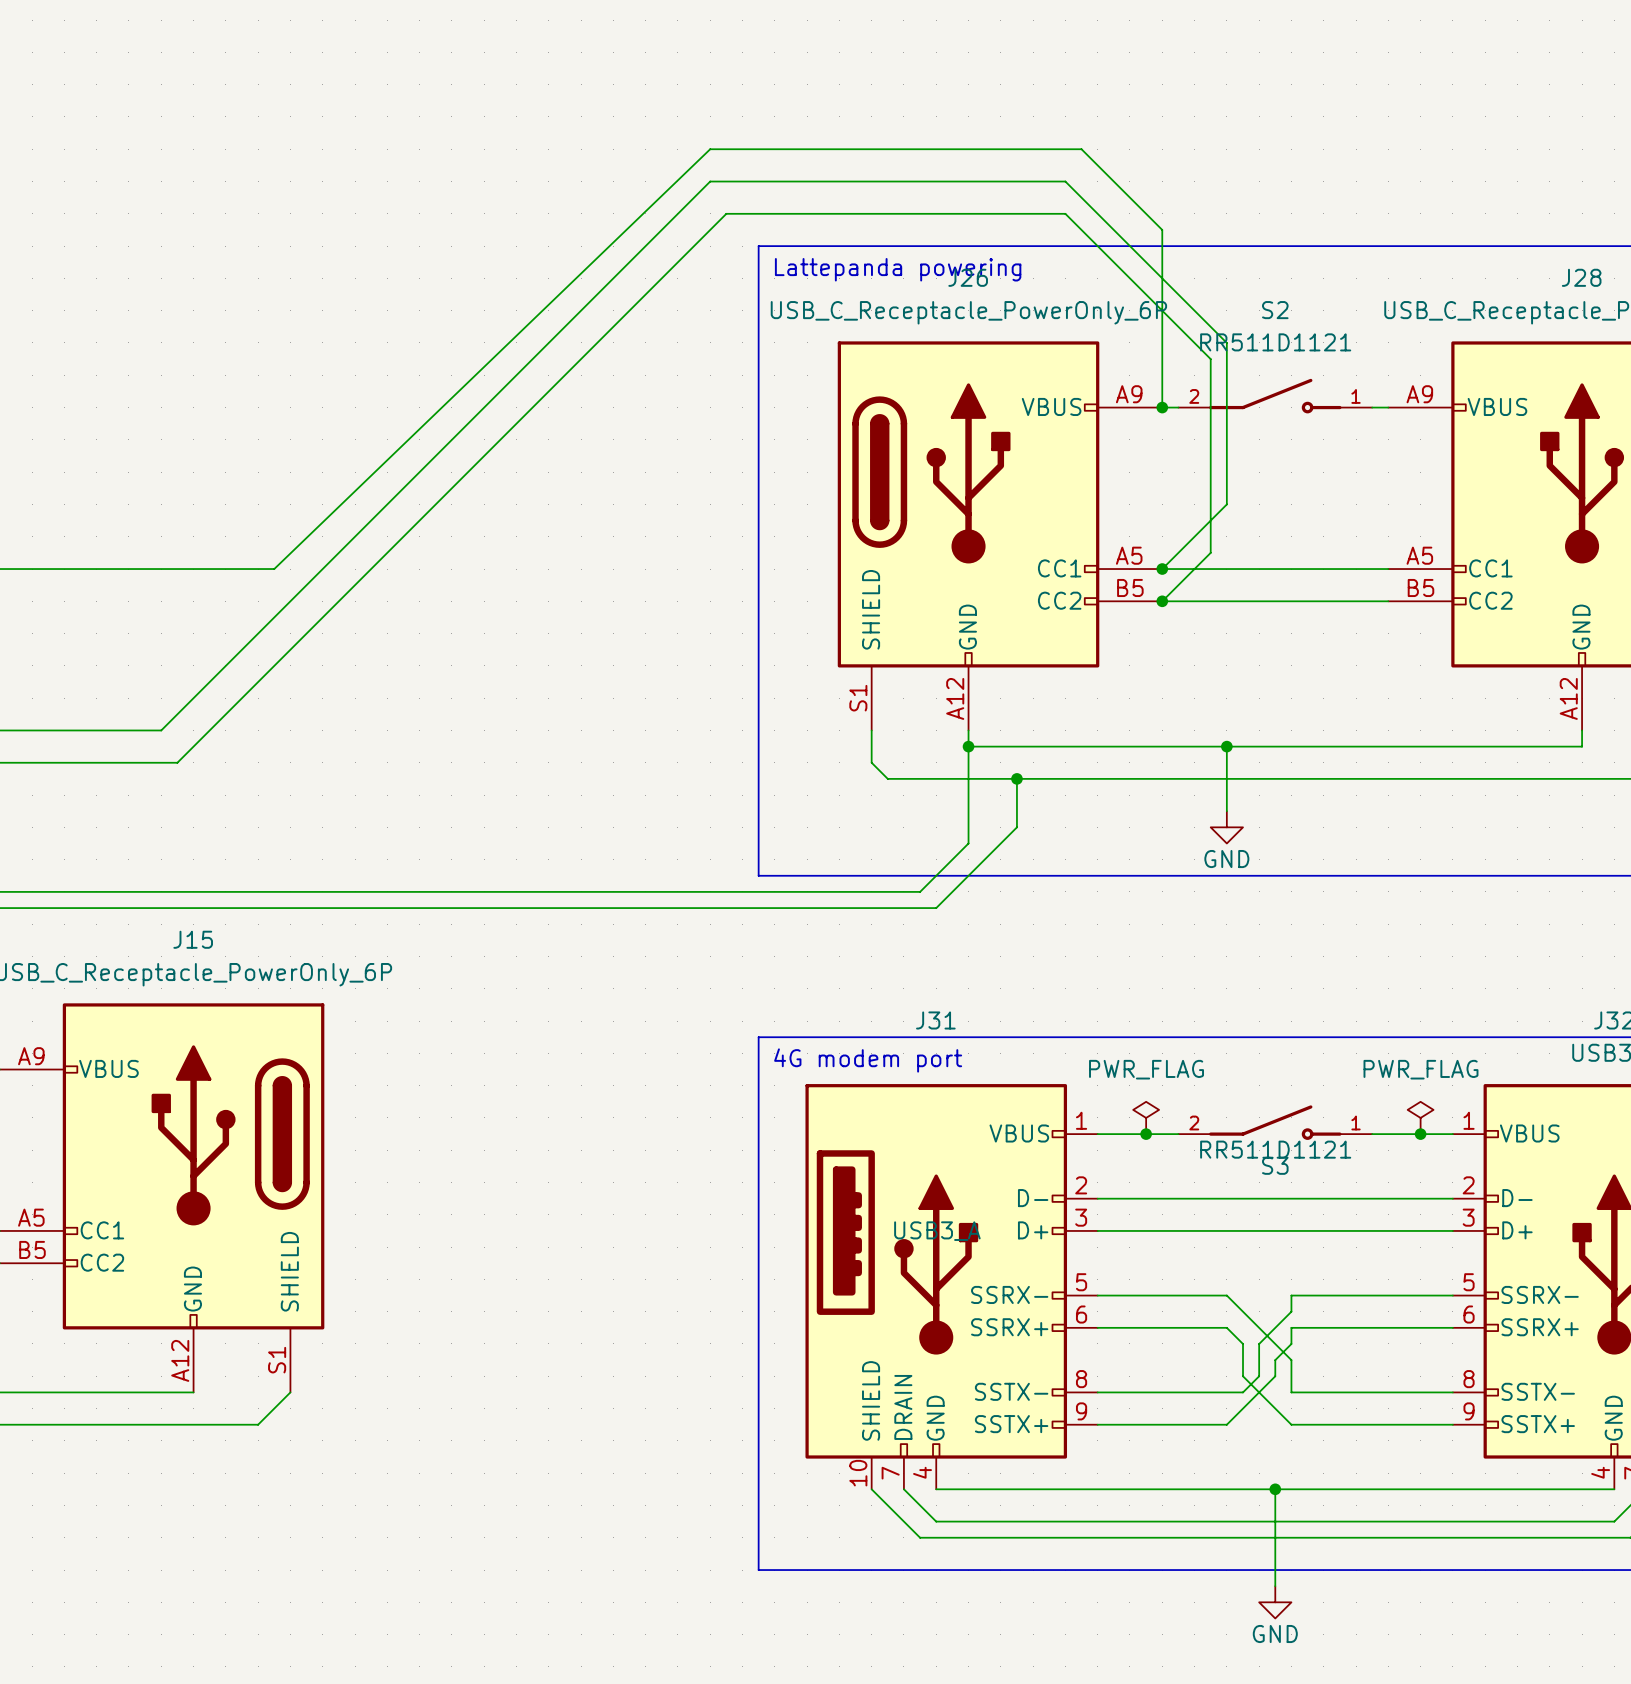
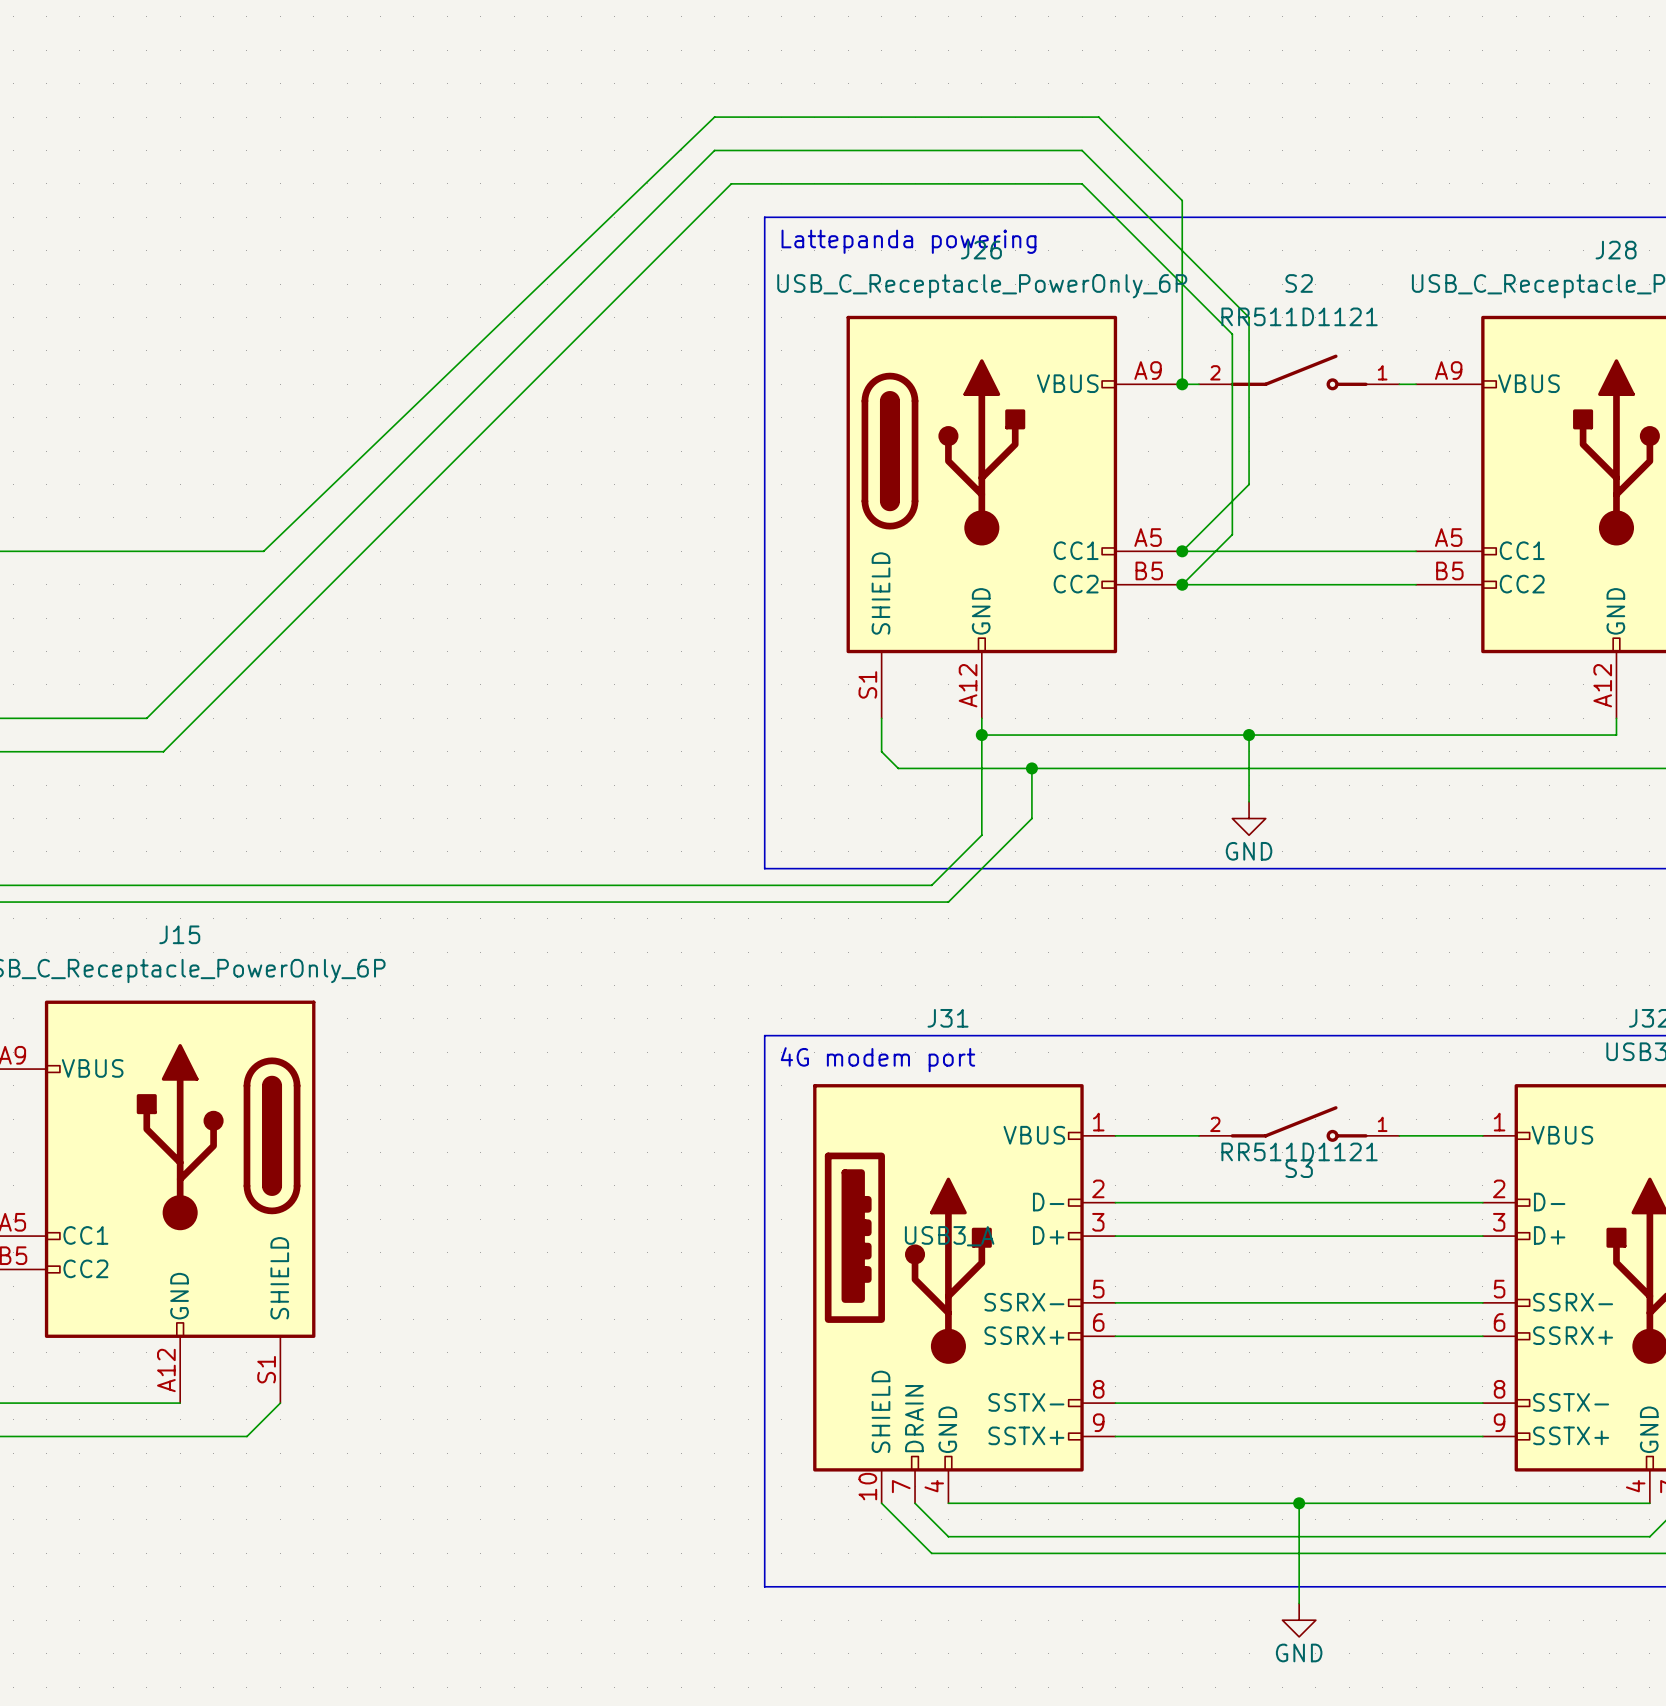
power symbol: PWR_FLAG (1146, 1117) -> none
power symbol: PWR_FLAG (1420, 1117) -> none
junction: (1146, 1134) -> none
junction: (1420, 1134) -> none
wire: (1226, 1295) (1291, 1360) (1291, 1392) -> (1249, 1302) (1315, 1302)
wire: (1291, 1295) (1291, 1311) (1259, 1343) (1259, 1376) (1243, 1392) -> (1315, 1403) (1265, 1403)
wire: (1226, 1327) (1243, 1343) (1243, 1376) (1291, 1424) -> (1249, 1336) (1315, 1336)
wire: (1291, 1327) (1291, 1343) (1275, 1360) (1275, 1376) (1226, 1424) -> (1315, 1436) (1249, 1436)

